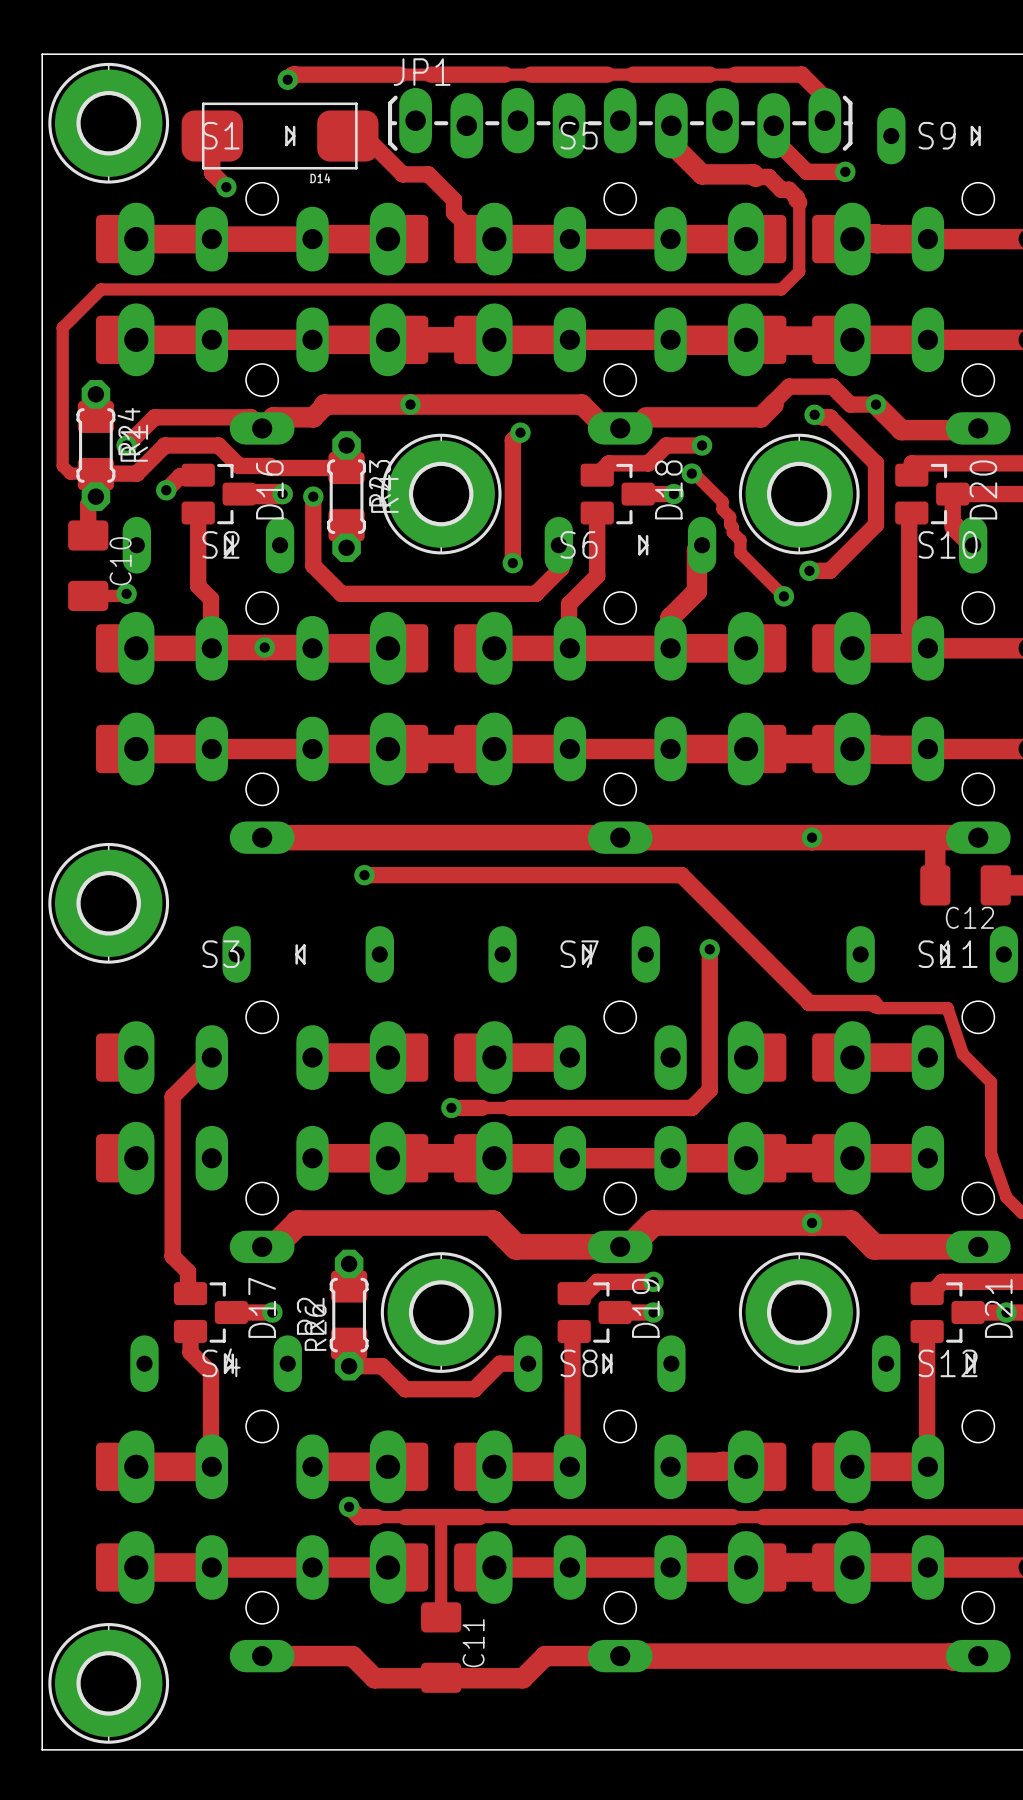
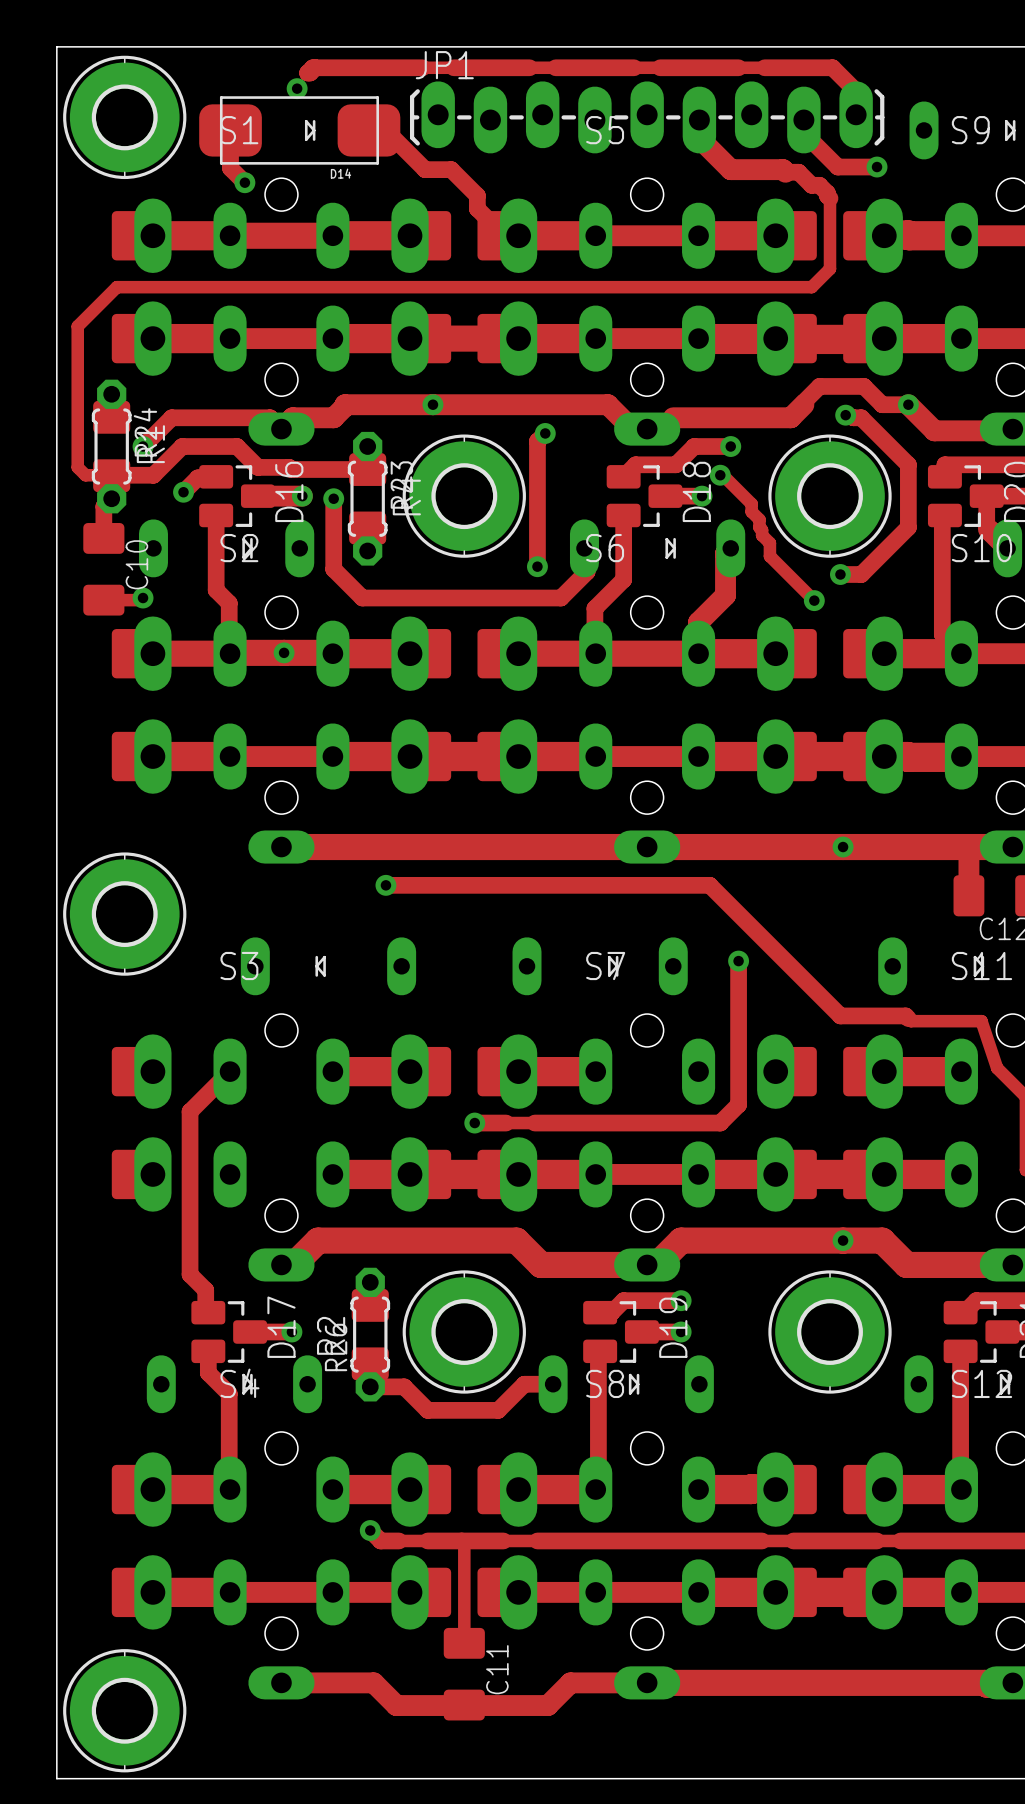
via position: (287, 79) -> (297, 88)

